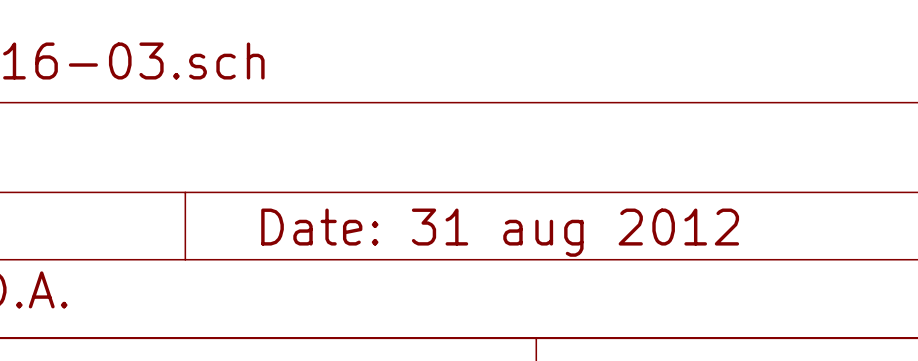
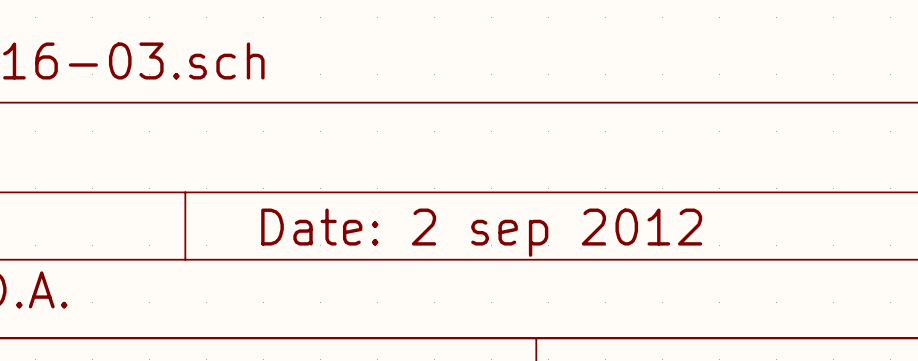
title block: Date: 31 aug 2012 (500, 232) -> Date: 2 sep 2012 (481, 232)

